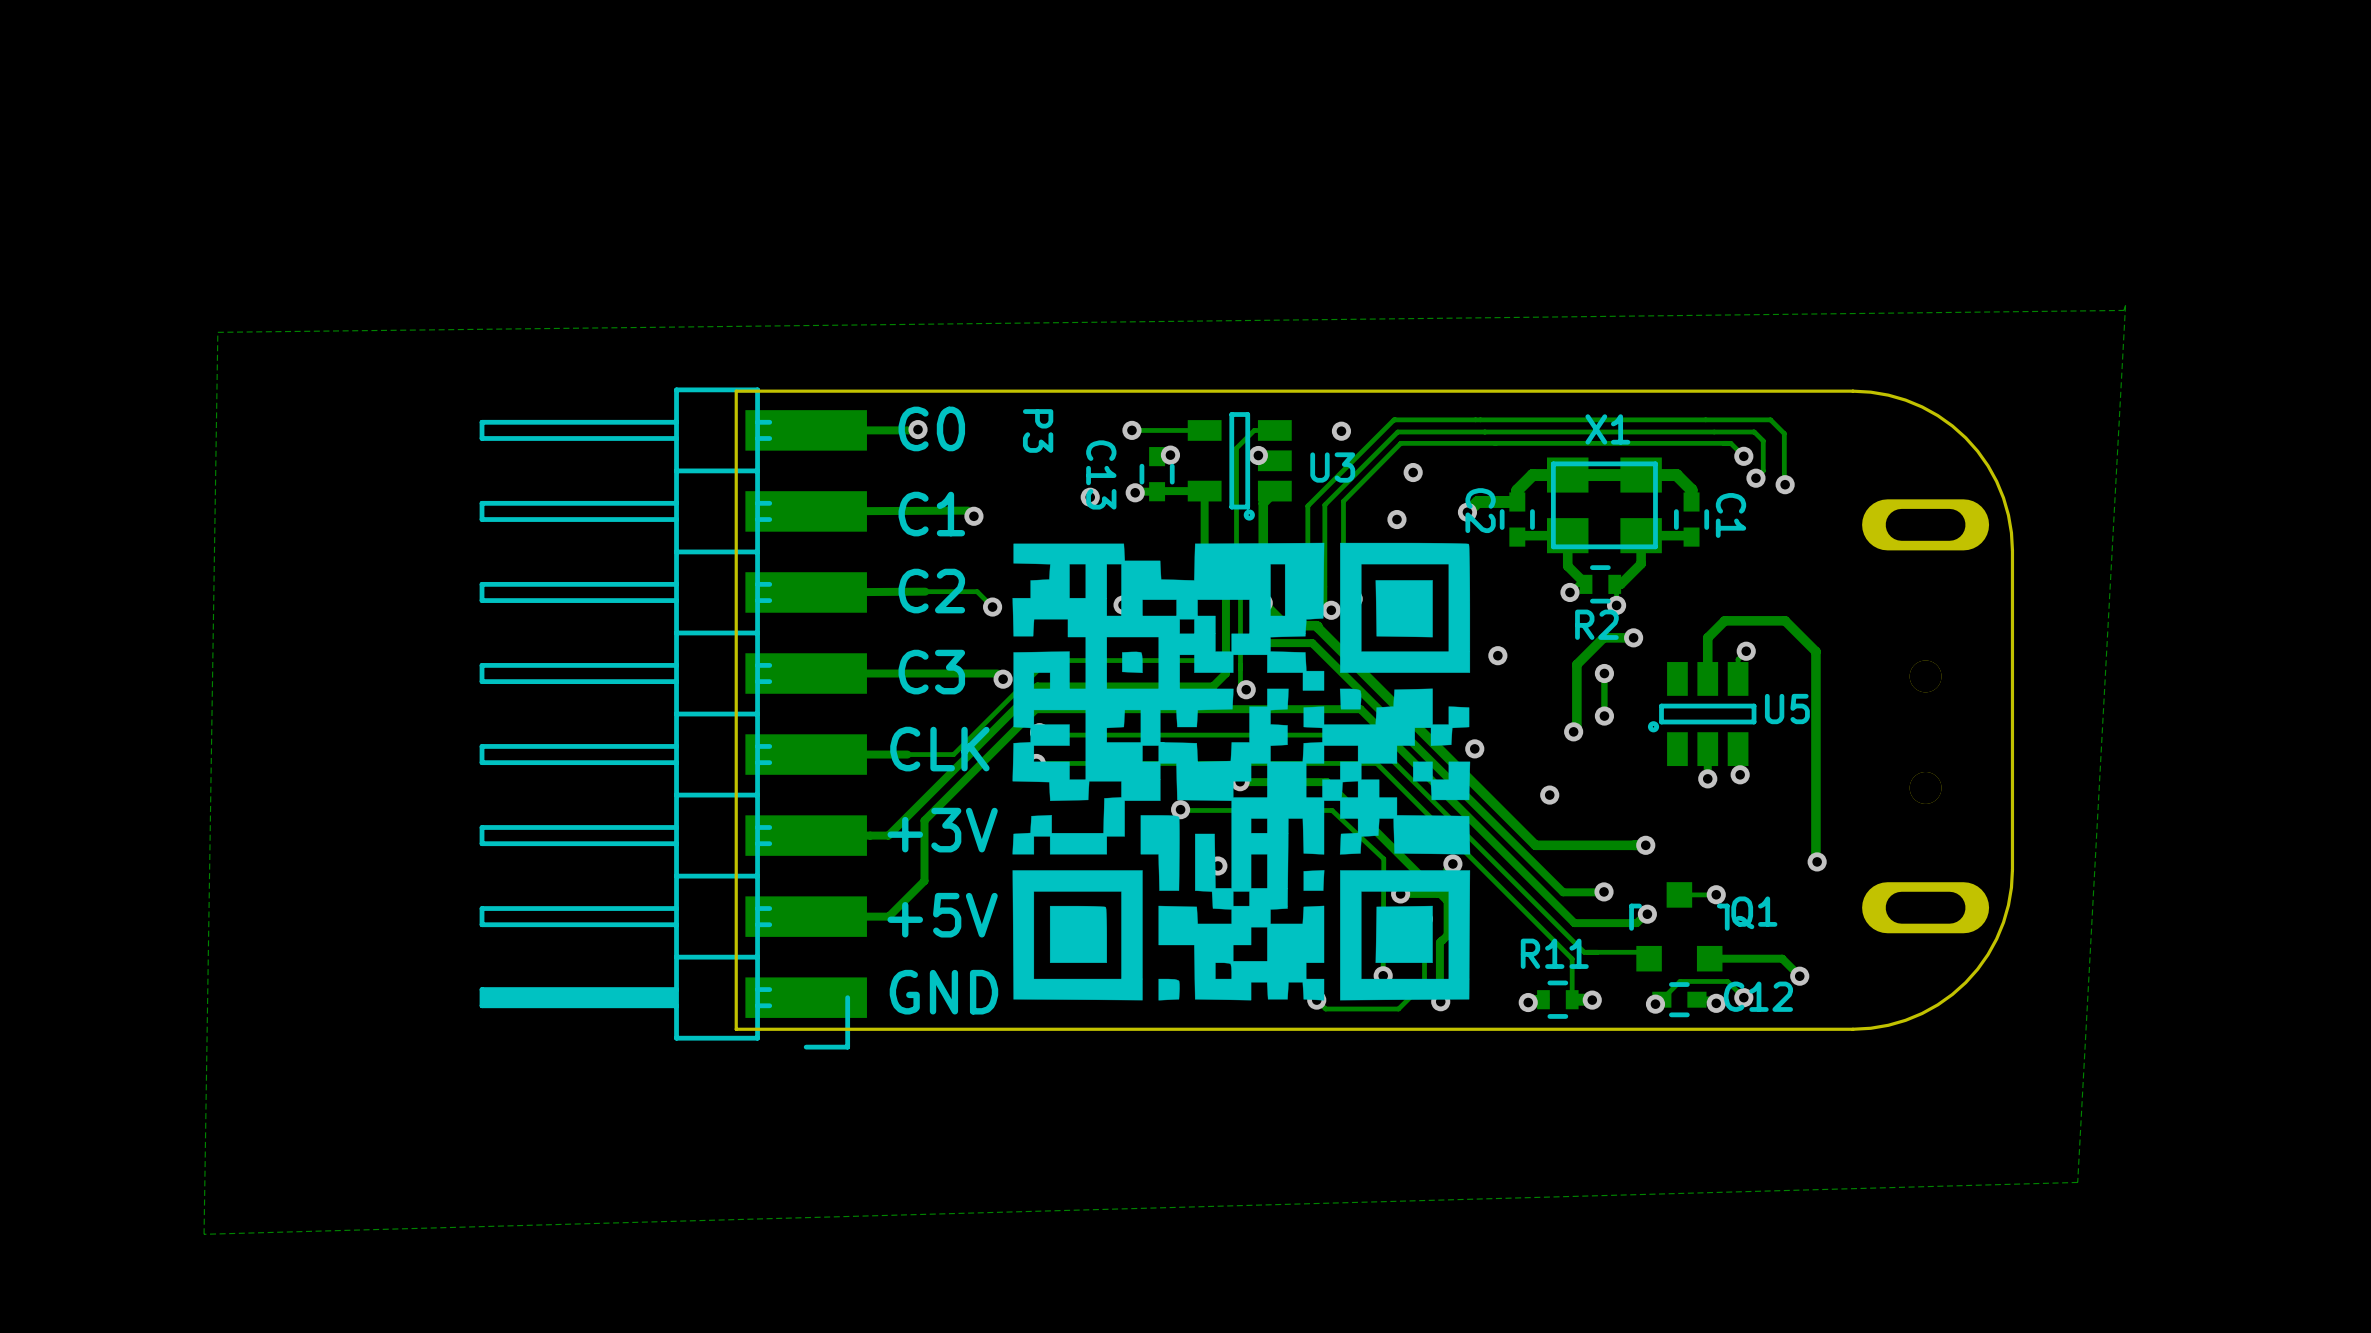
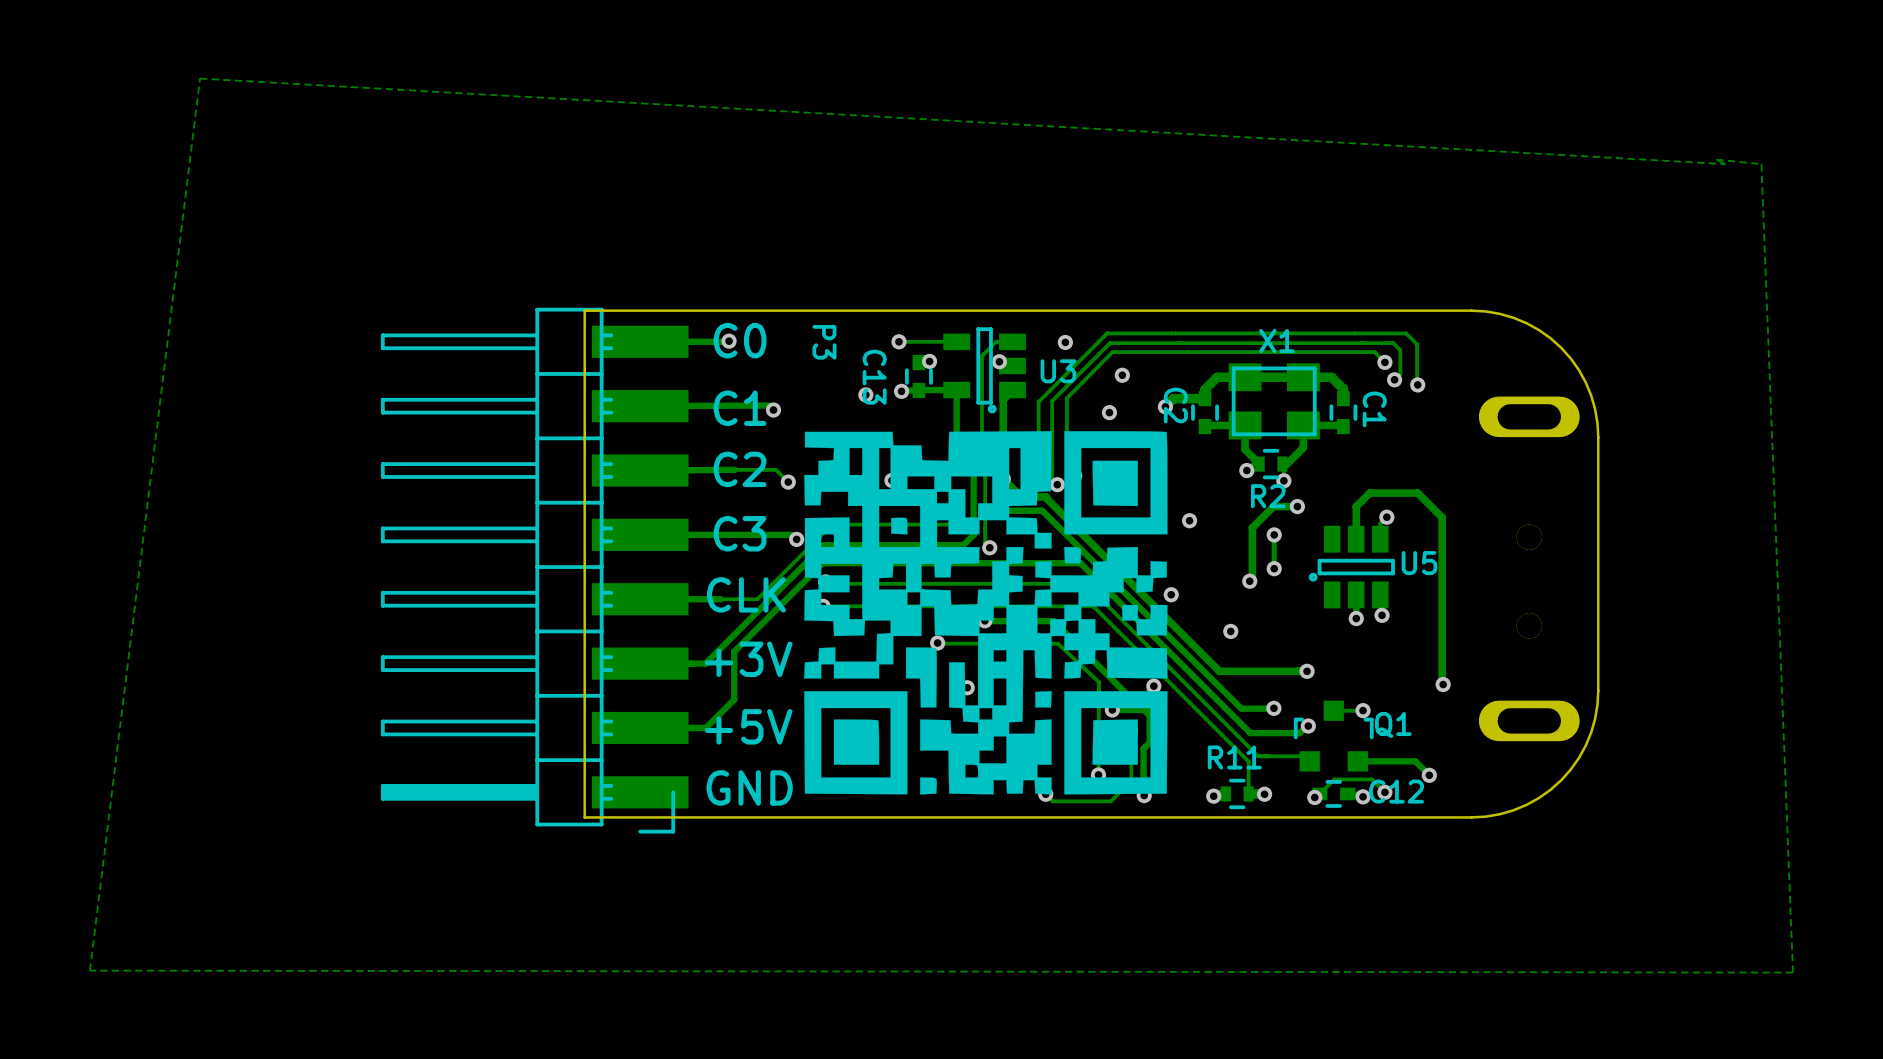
zone outline: (2125, 305) (2077, 1182) (204, 1234) (217, 332) (2123, 310) (2125, 305) -> (200, 78) (1725, 164) (1716, 159) (1761, 164) (1792, 972) (89, 970) (200, 78)

